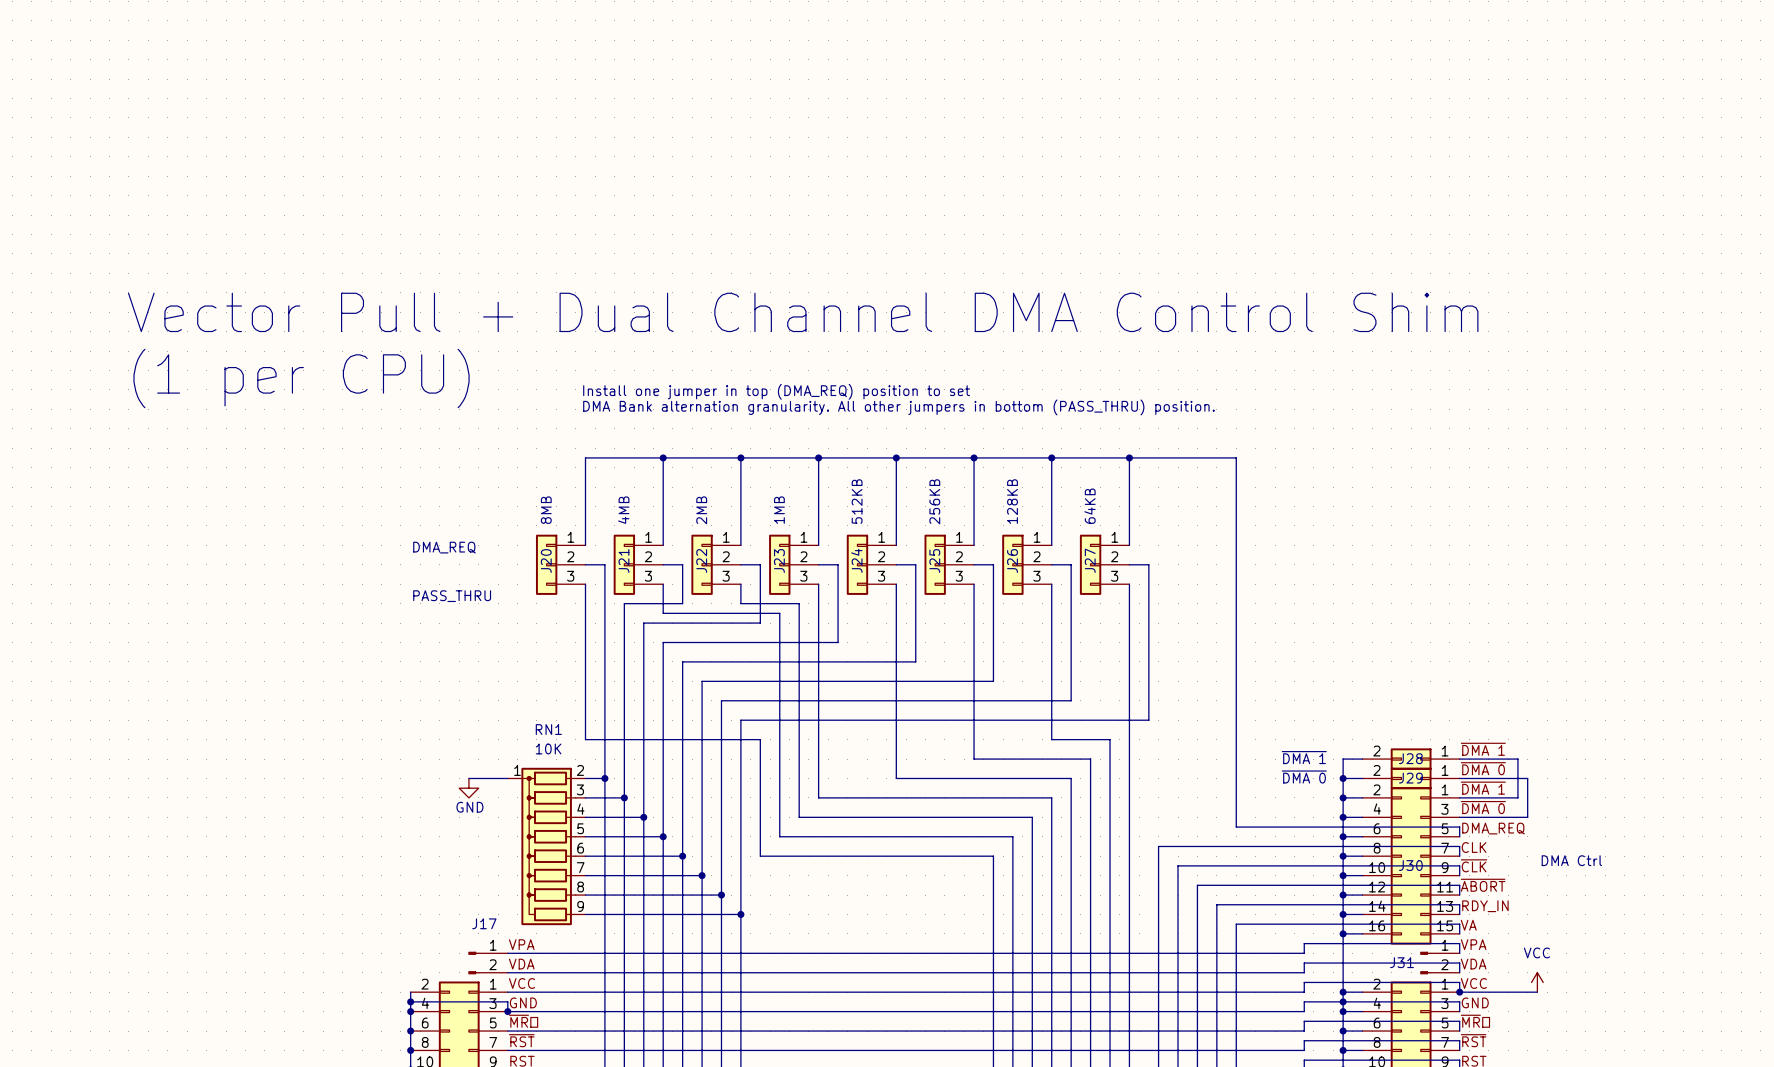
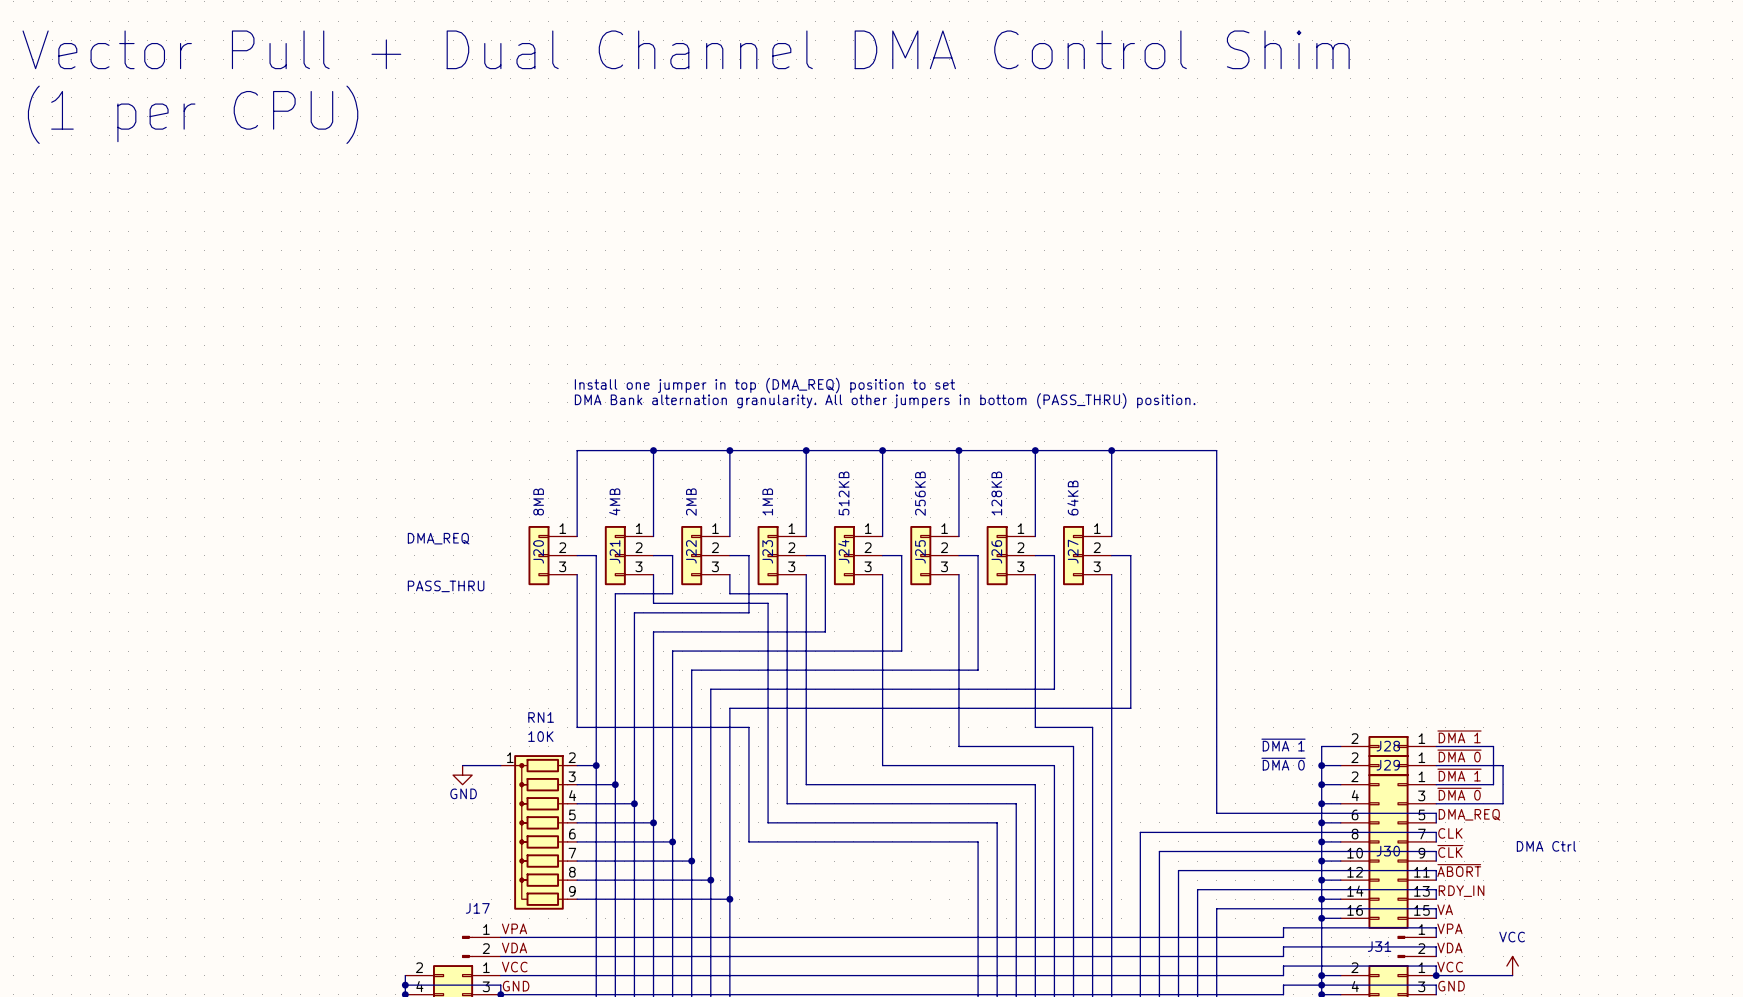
text: none -> Vector Pull + Dual Channel DMA Control Shim (686, 49)
text: none -> (1 per CPU) (193, 114)
text: Vector Pull + Dual Channel DMA Control Shim (803, 312) -> none
text: (1 per CPU) (301, 378) -> none

